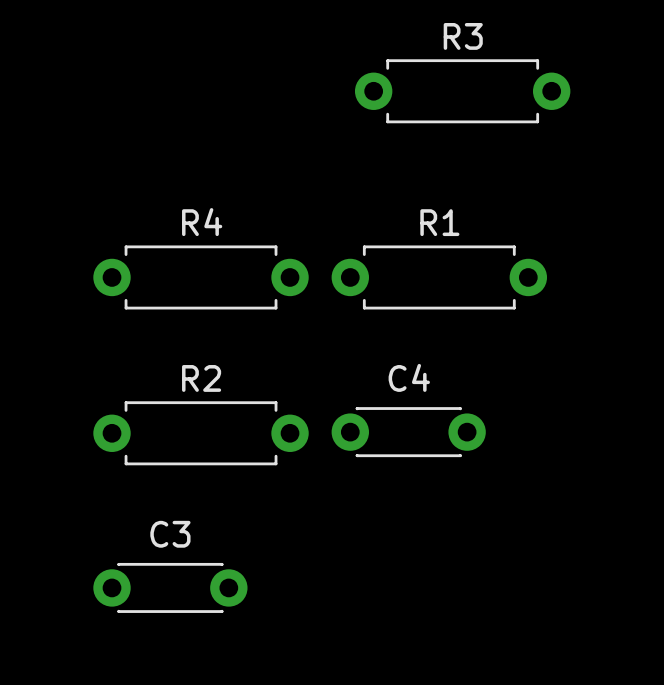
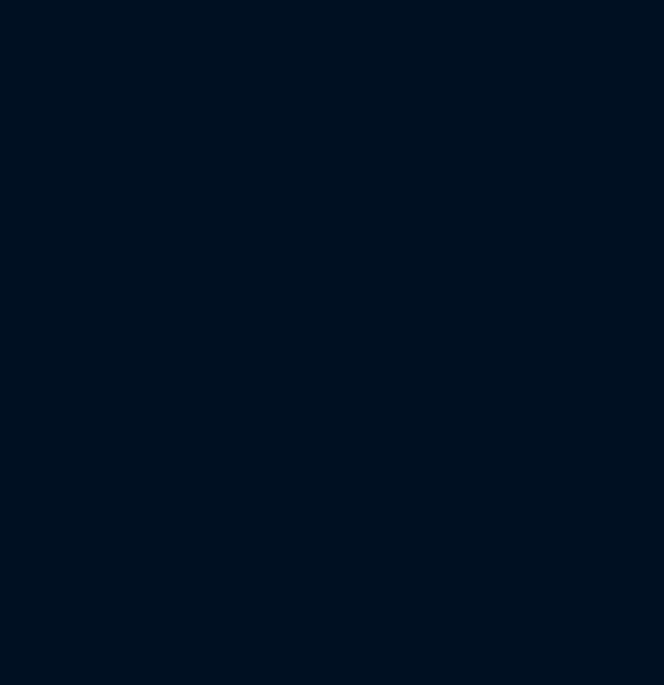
R3: (462, 91) -> none
R4: (201, 277) -> none
R1: (439, 277) -> none
C4: (408, 432) -> none
R2: (201, 433) -> none
C3: (170, 587) -> none

